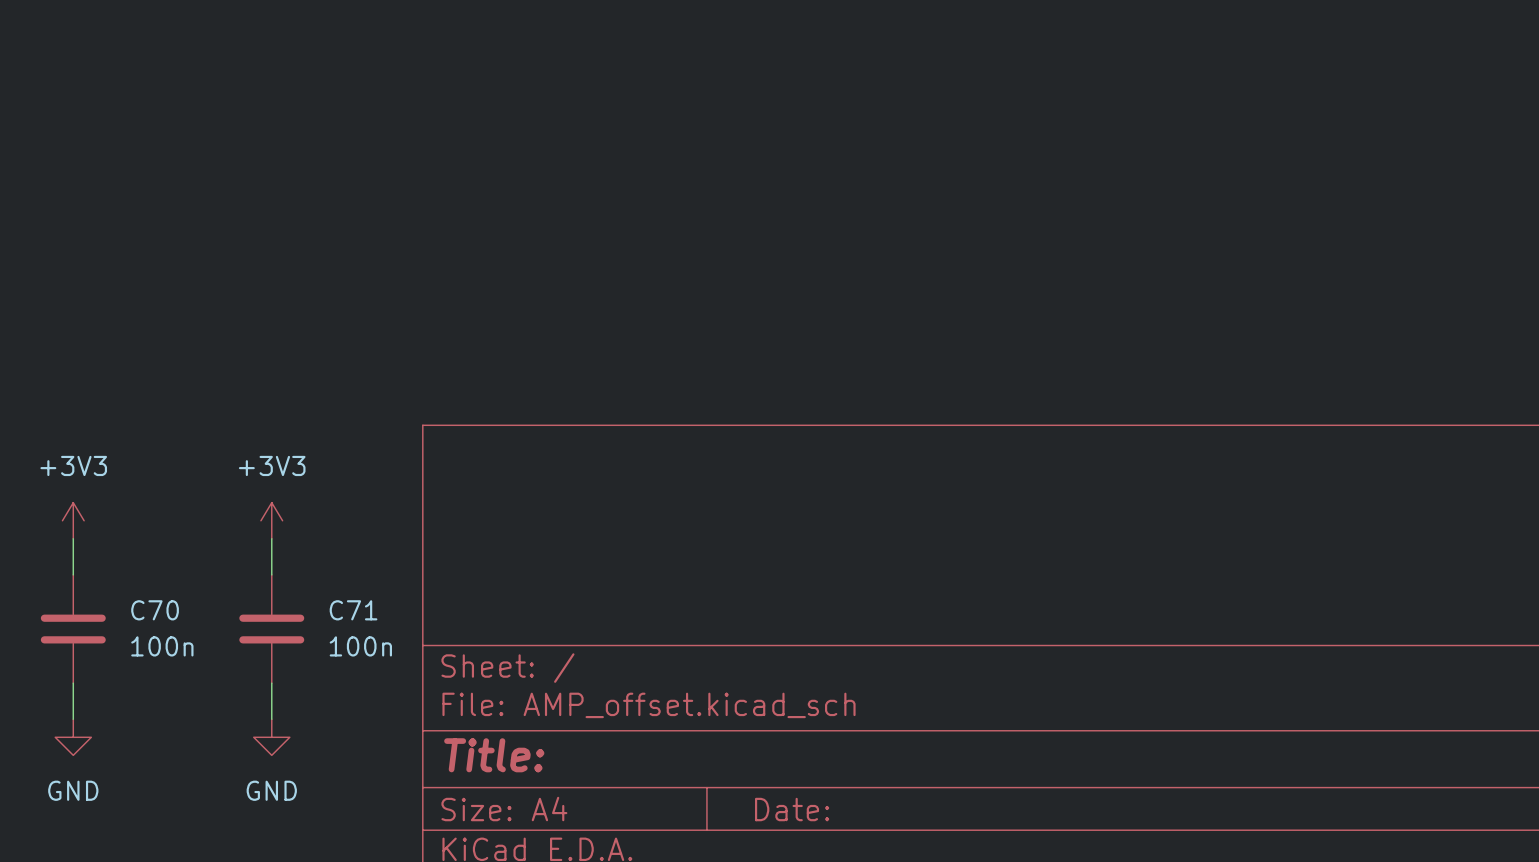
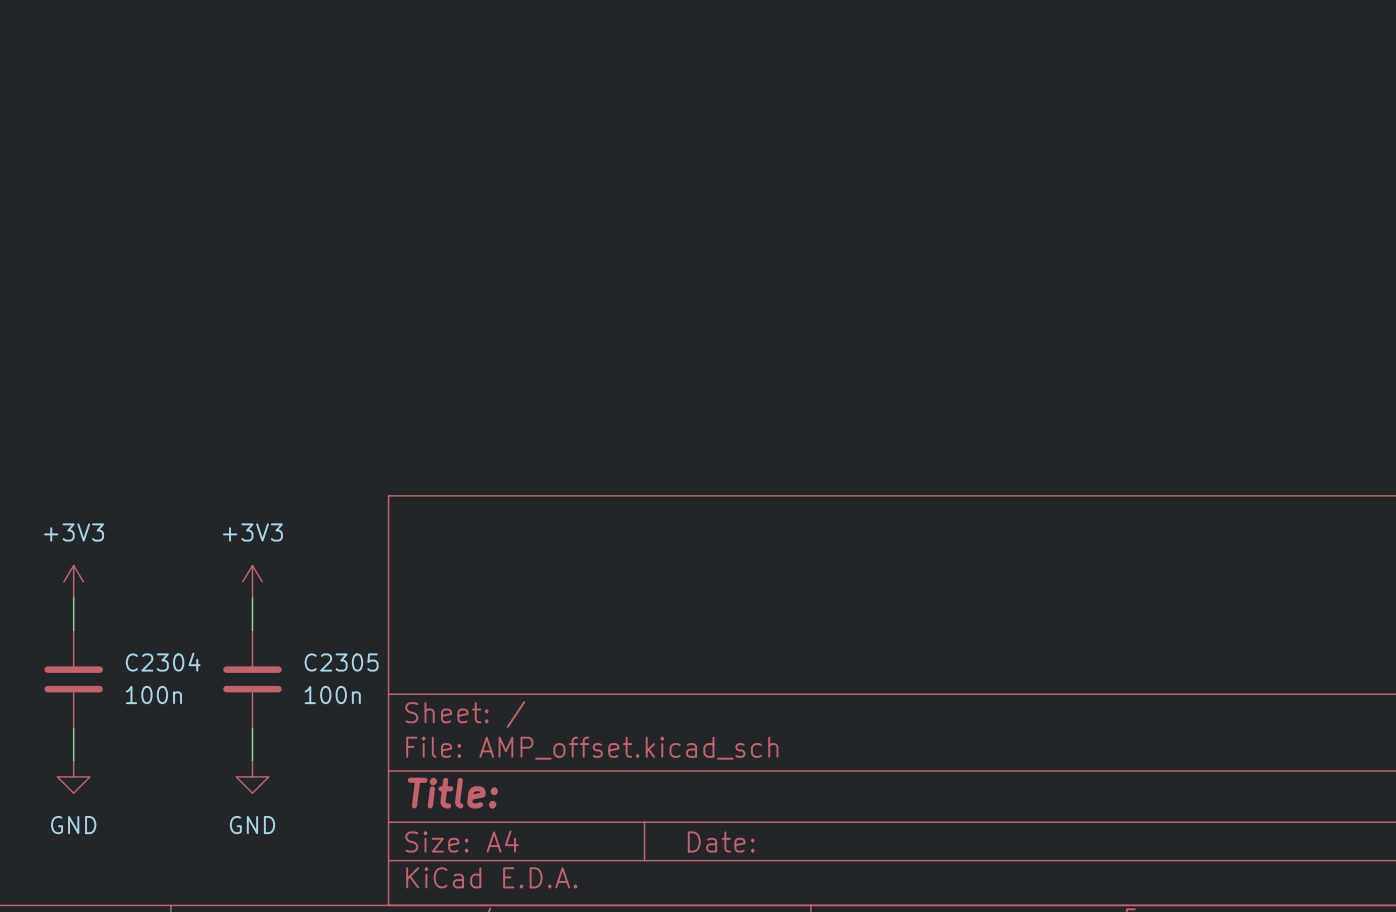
C70 name: C70 (155, 610) -> C2304 (163, 662)
C71 name: C71 (353, 610) -> C2305 (341, 662)

